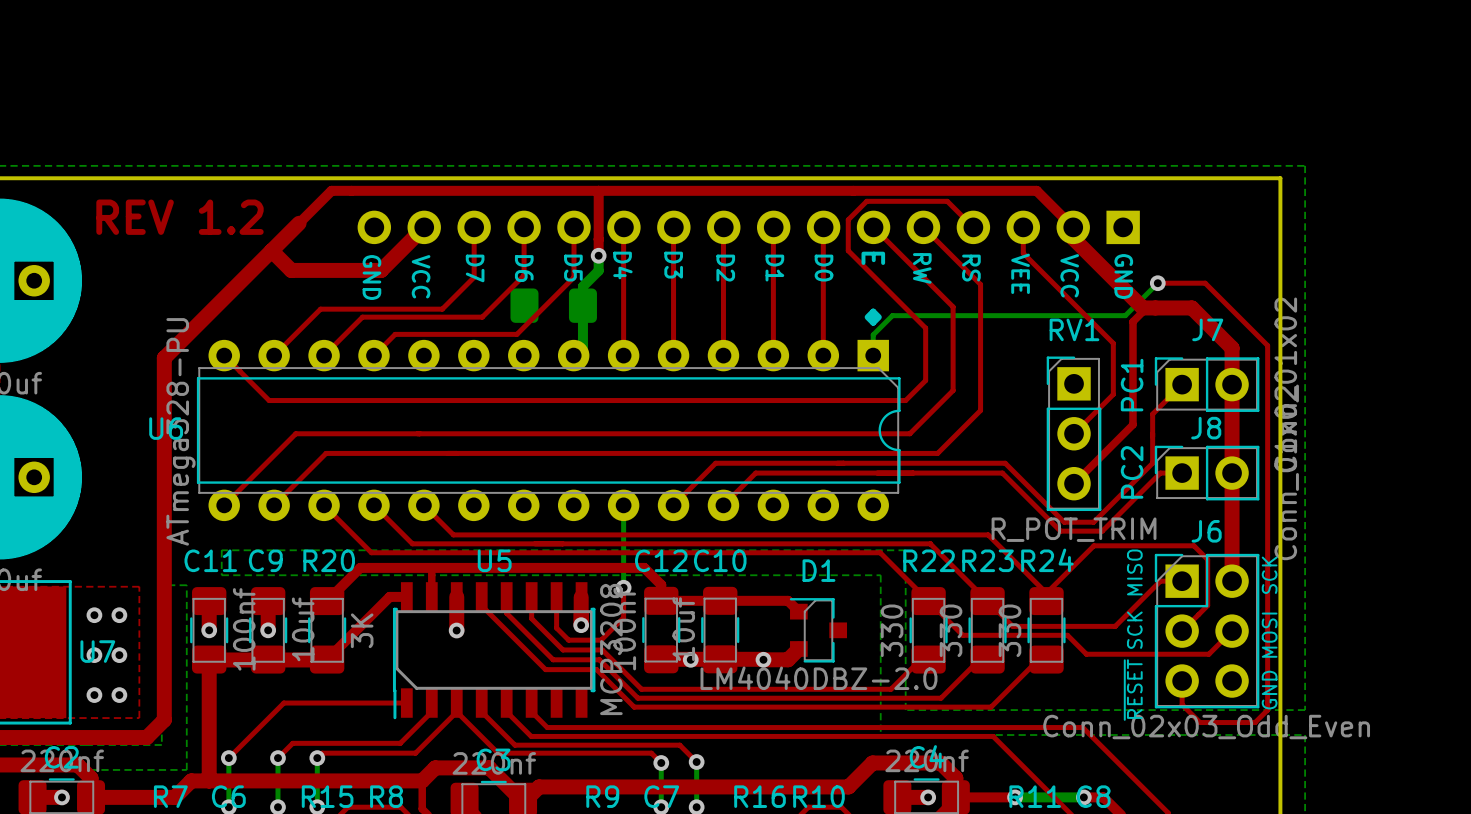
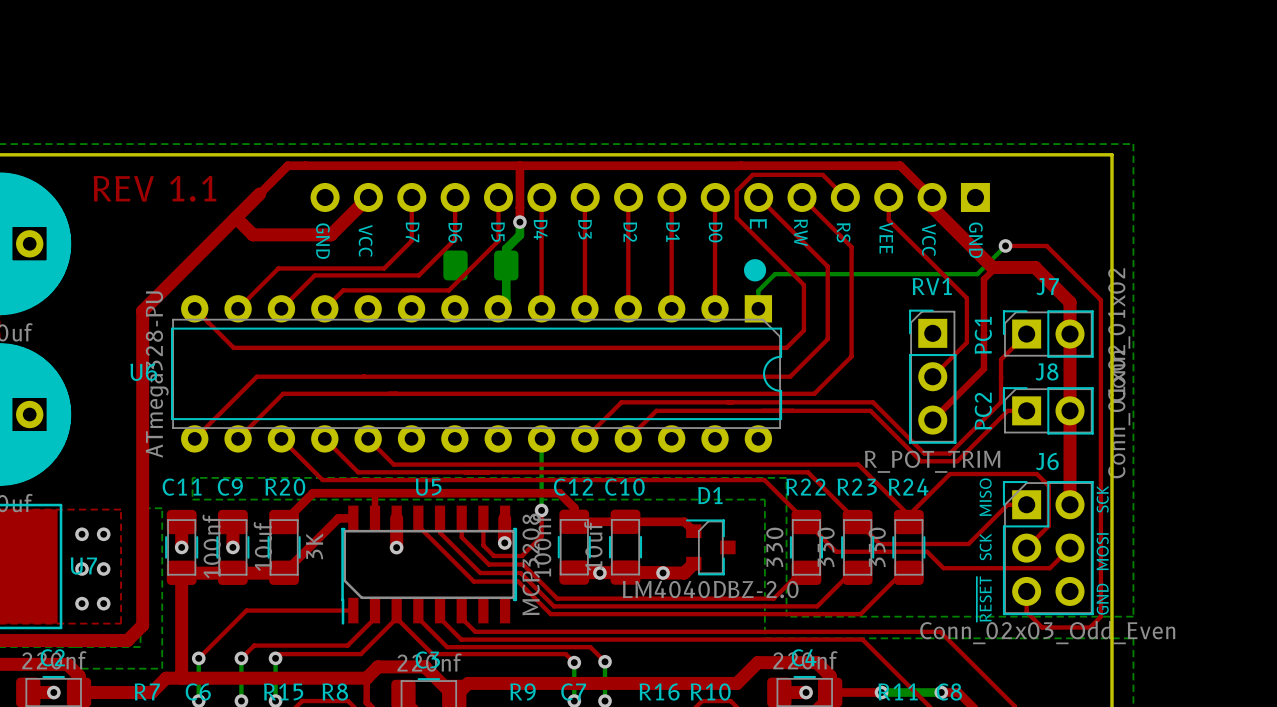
text: REV 1.2 (179, 217) -> REV 1.1 (154, 188)

